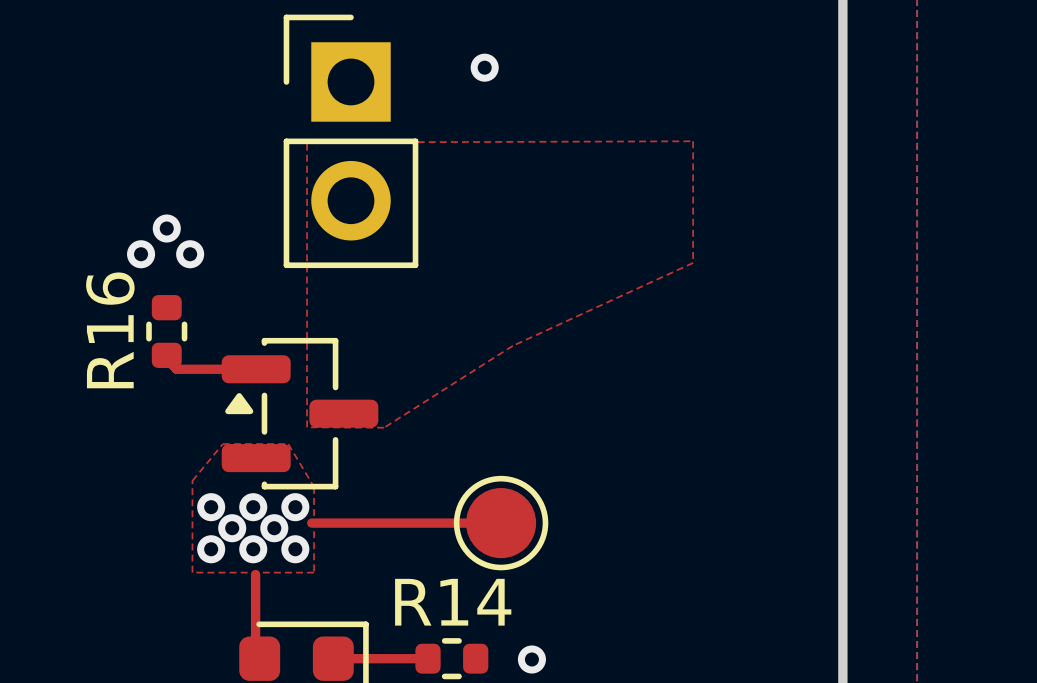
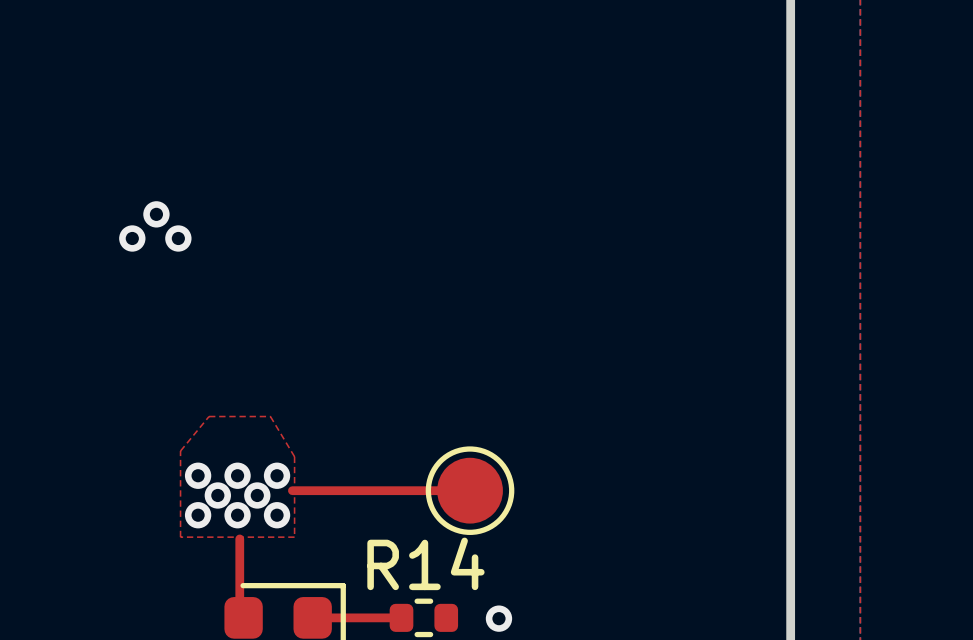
via: (484, 67) -> none
part: (351, 141) -> none
top zone outline: (693, 141) (307, 142) (307, 427) (384, 427) (512, 345) (693, 262) (693, 141) -> none
R16: (166, 331) -> none
top track: (166, 359) (176, 369) (256, 369) -> none
part: (300, 413) -> none

